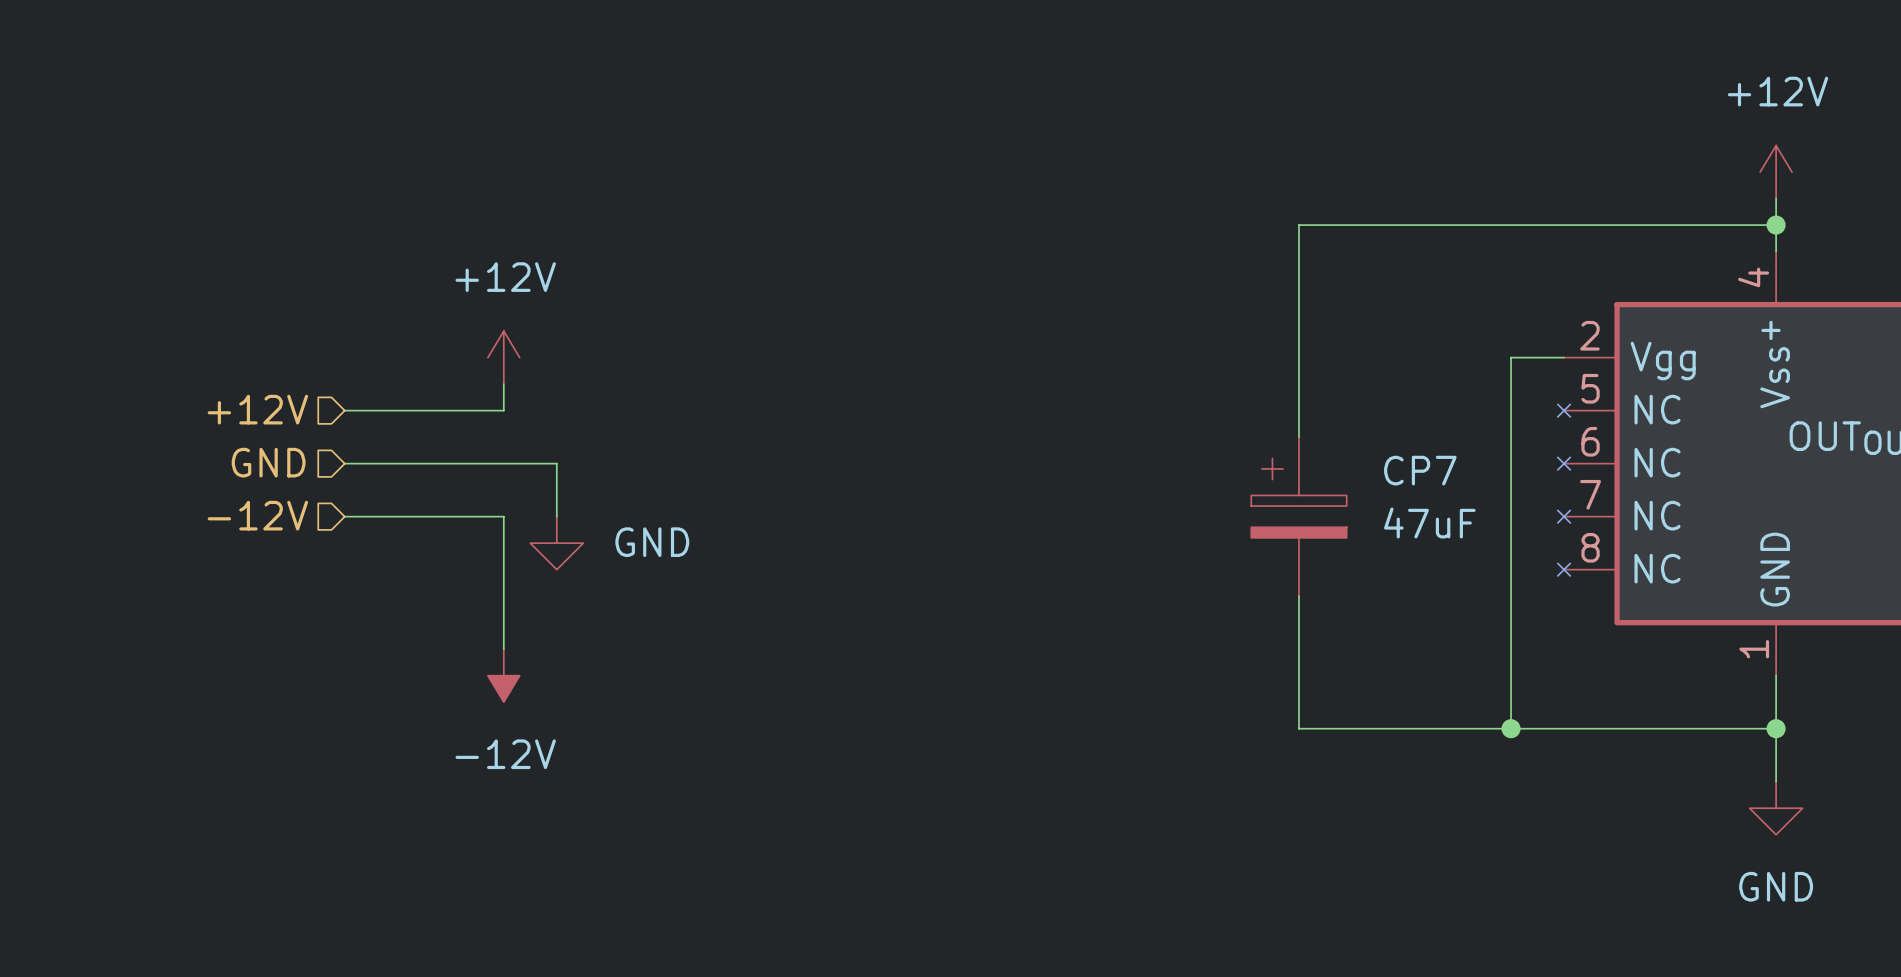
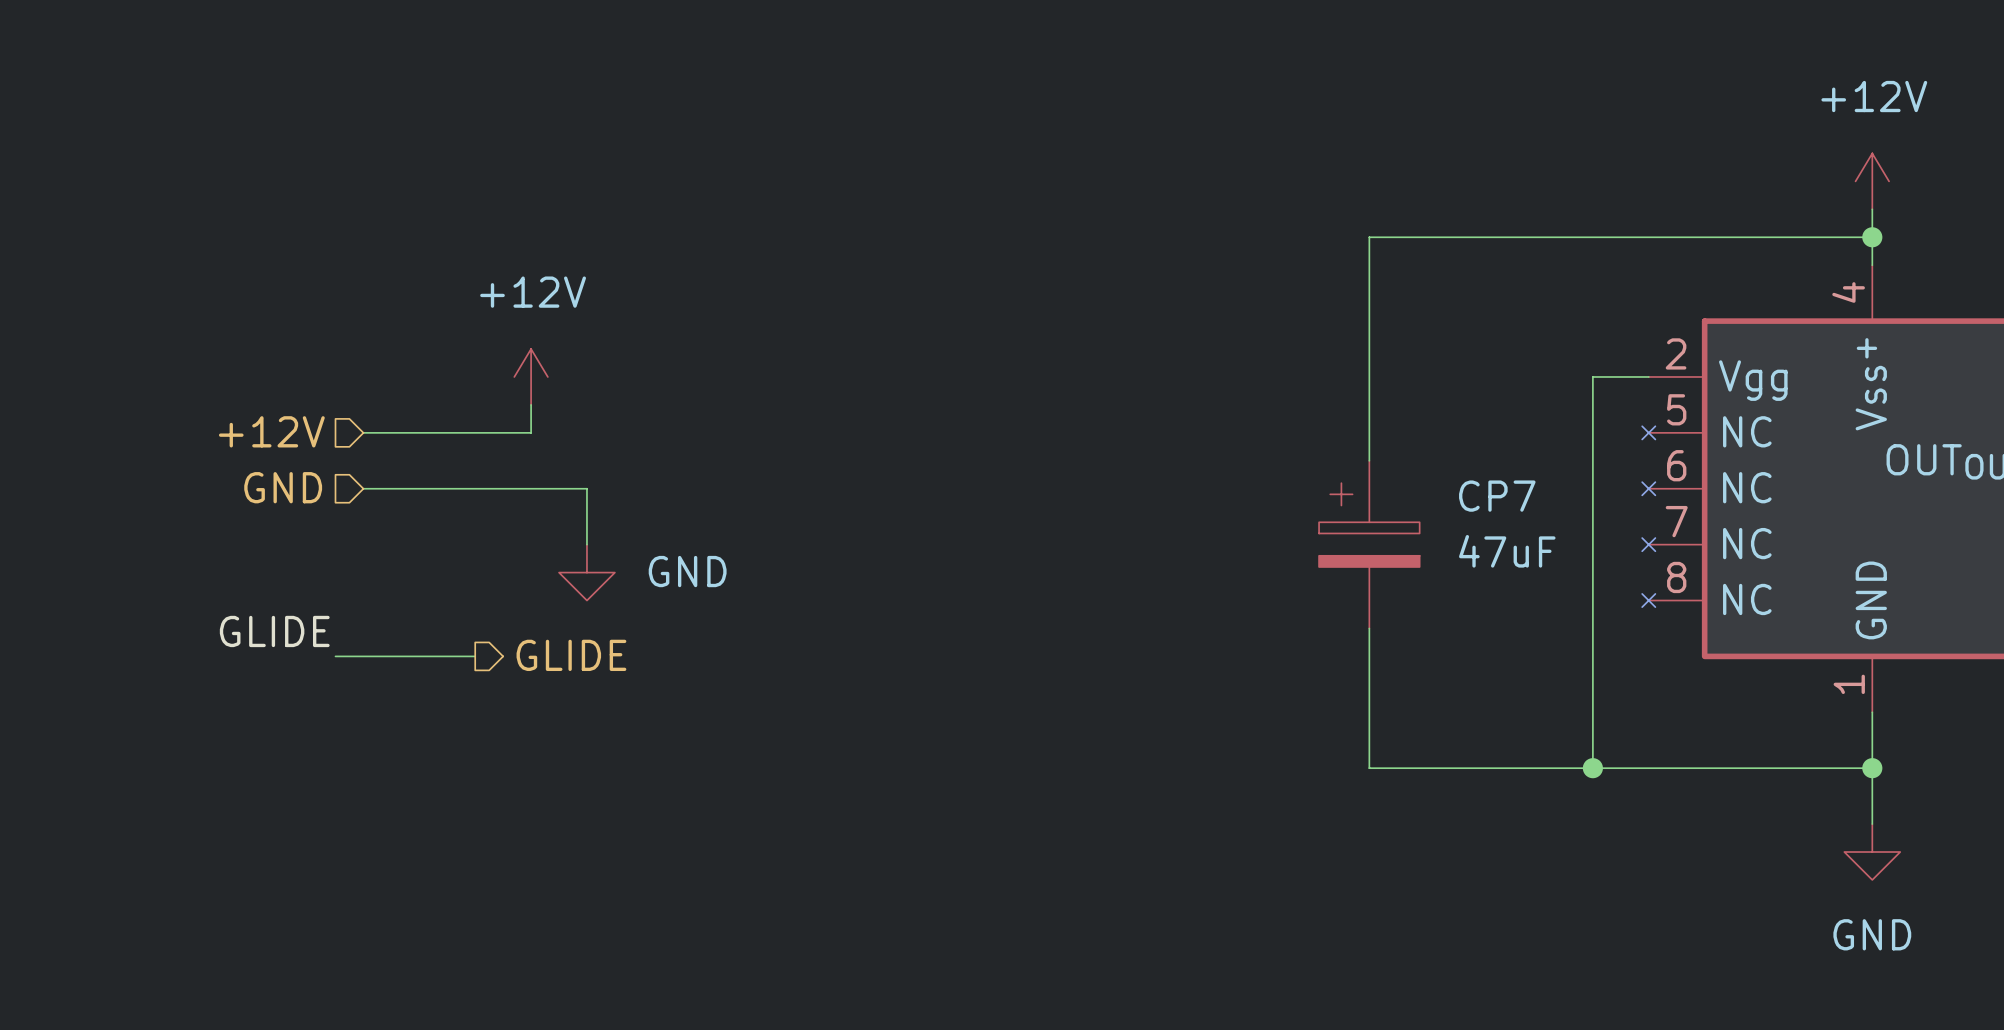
hierarchical label: -12V (257, 515) -> none
wire: (344, 516) (503, 516) (503, 649) -> none
label: none -> GLIDE (274, 631)
hierarchical label: none -> GLIDE (571, 655)
wire: none -> (335, 656) (475, 656)
power symbol: -12V (503, 675) -> none

